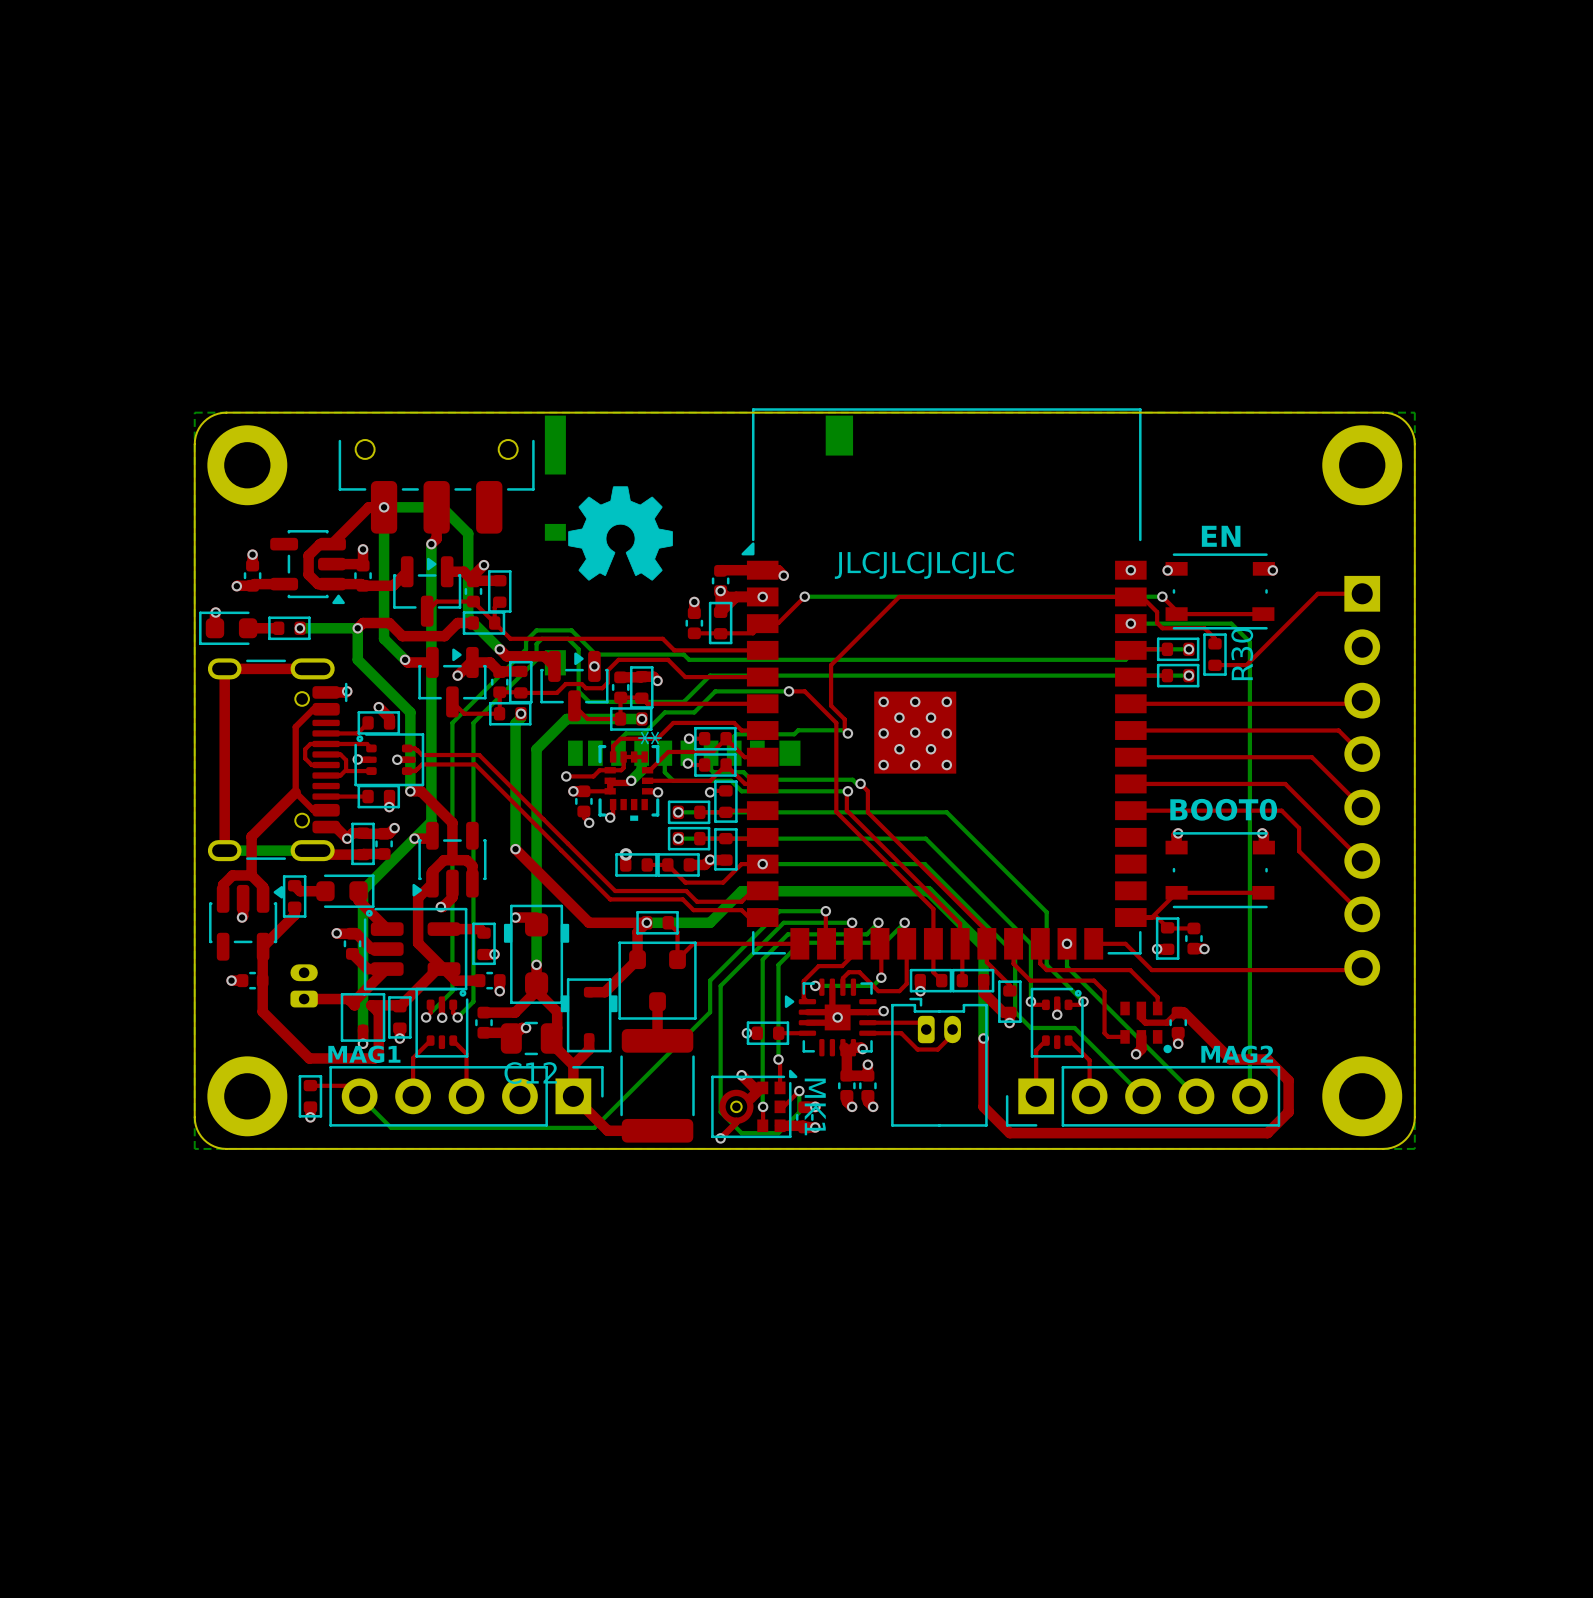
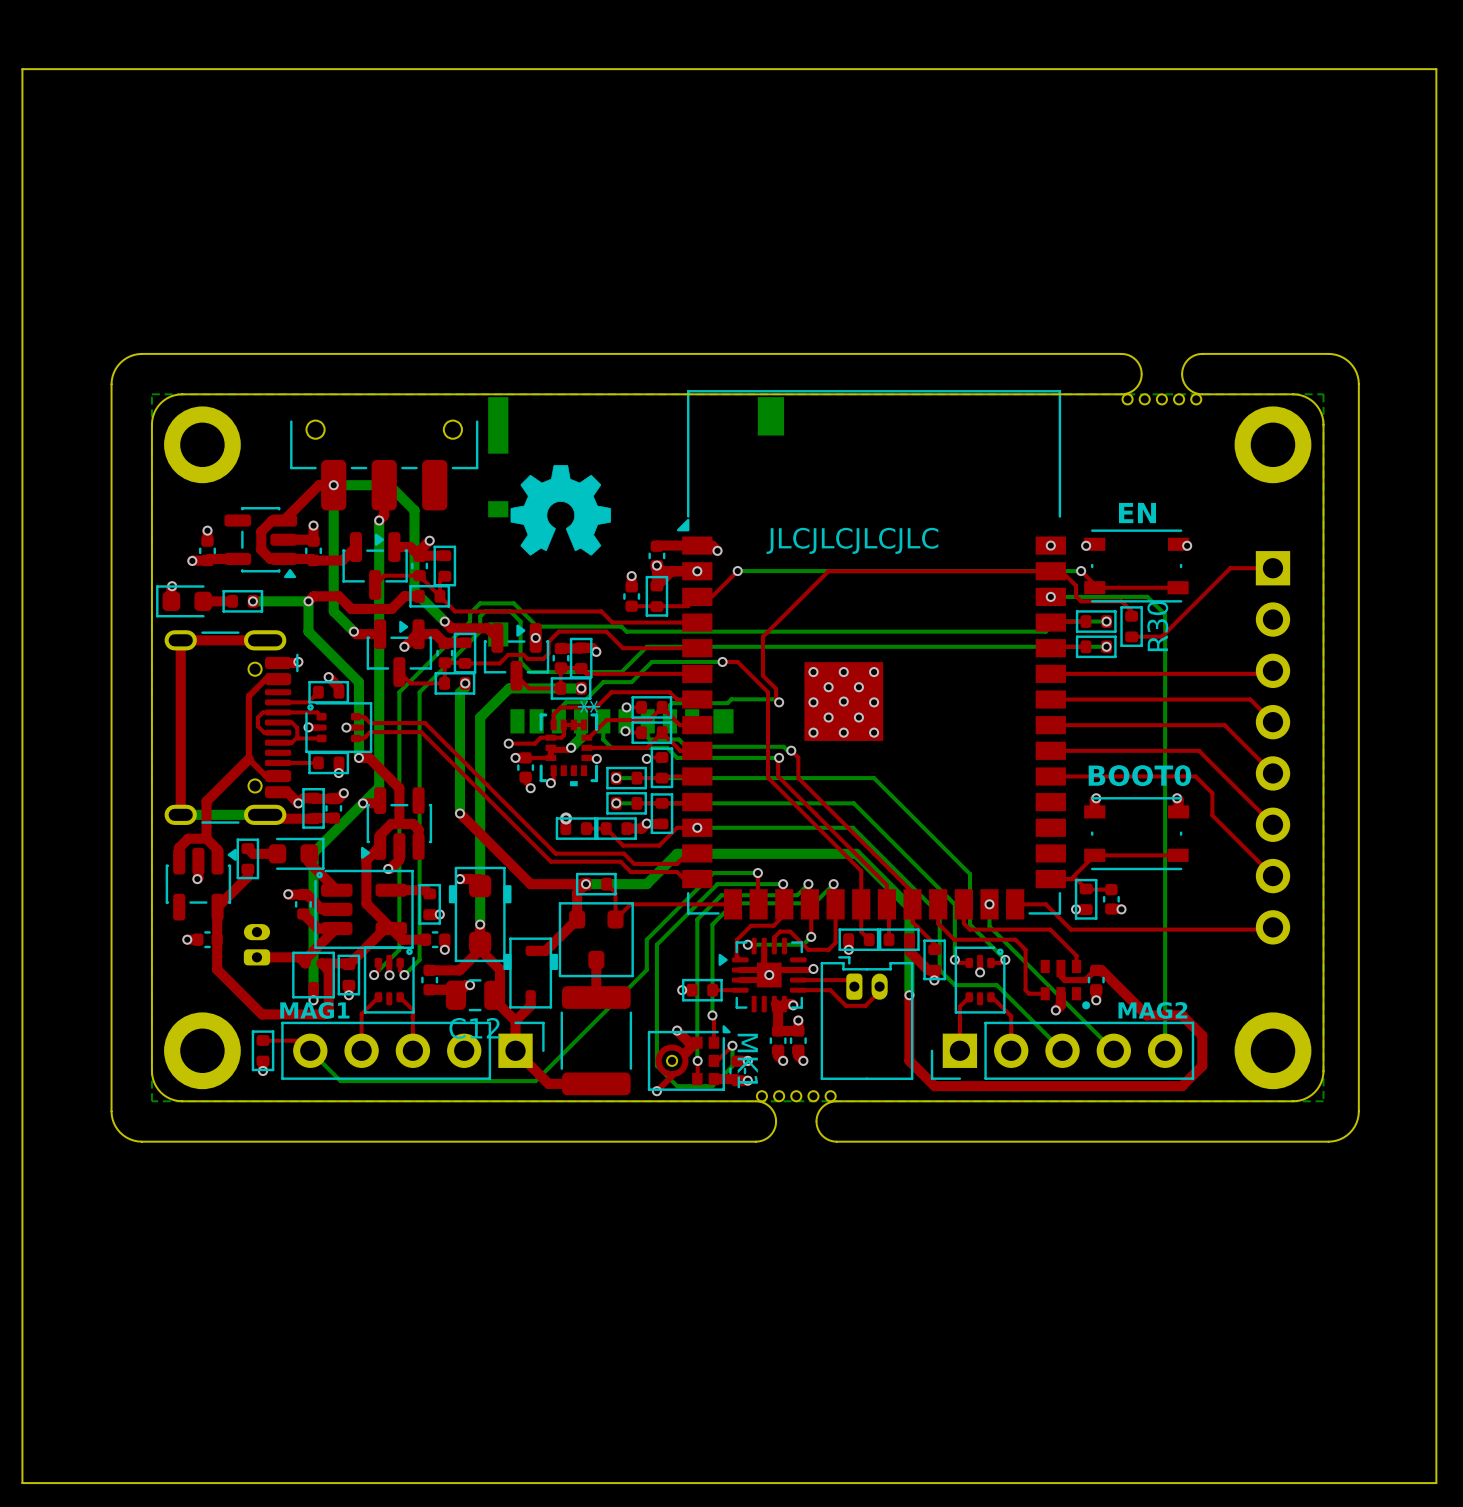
board edge: none -> (22, 69) (1436, 69) (1436, 1483) (22, 1483) (22, 69)
board edge: none -> (1141, 374) (1140, 366) (1135, 359) (1129, 355) (1121, 353) (141, 353) (130, 356) (123, 360) (113, 372) (111, 384) (111, 1111) (113, 1122) (120, 1132) (130, 1139) (141, 1141) (755, 1141) (763, 1140) (770, 1135) (774, 1129) (776, 1121)
board edge: none -> (1182, 374) (1186, 361) (1193, 355) (1200, 354) (1328, 353) (1340, 356) (1346, 360) (1352, 365) (1357, 376) (1358, 1111) (1356, 1122) (1352, 1129) (1343, 1137) (1328, 1141) (836, 1141) (828, 1140) (822, 1135) (818, 1129) (816, 1121)
part: none -> (1161, 388)
board edge: (1204, 412) (1288, 412) -> none
board edge: (823, 1148) (907, 1148) -> none
part: none -> (796, 1106)

